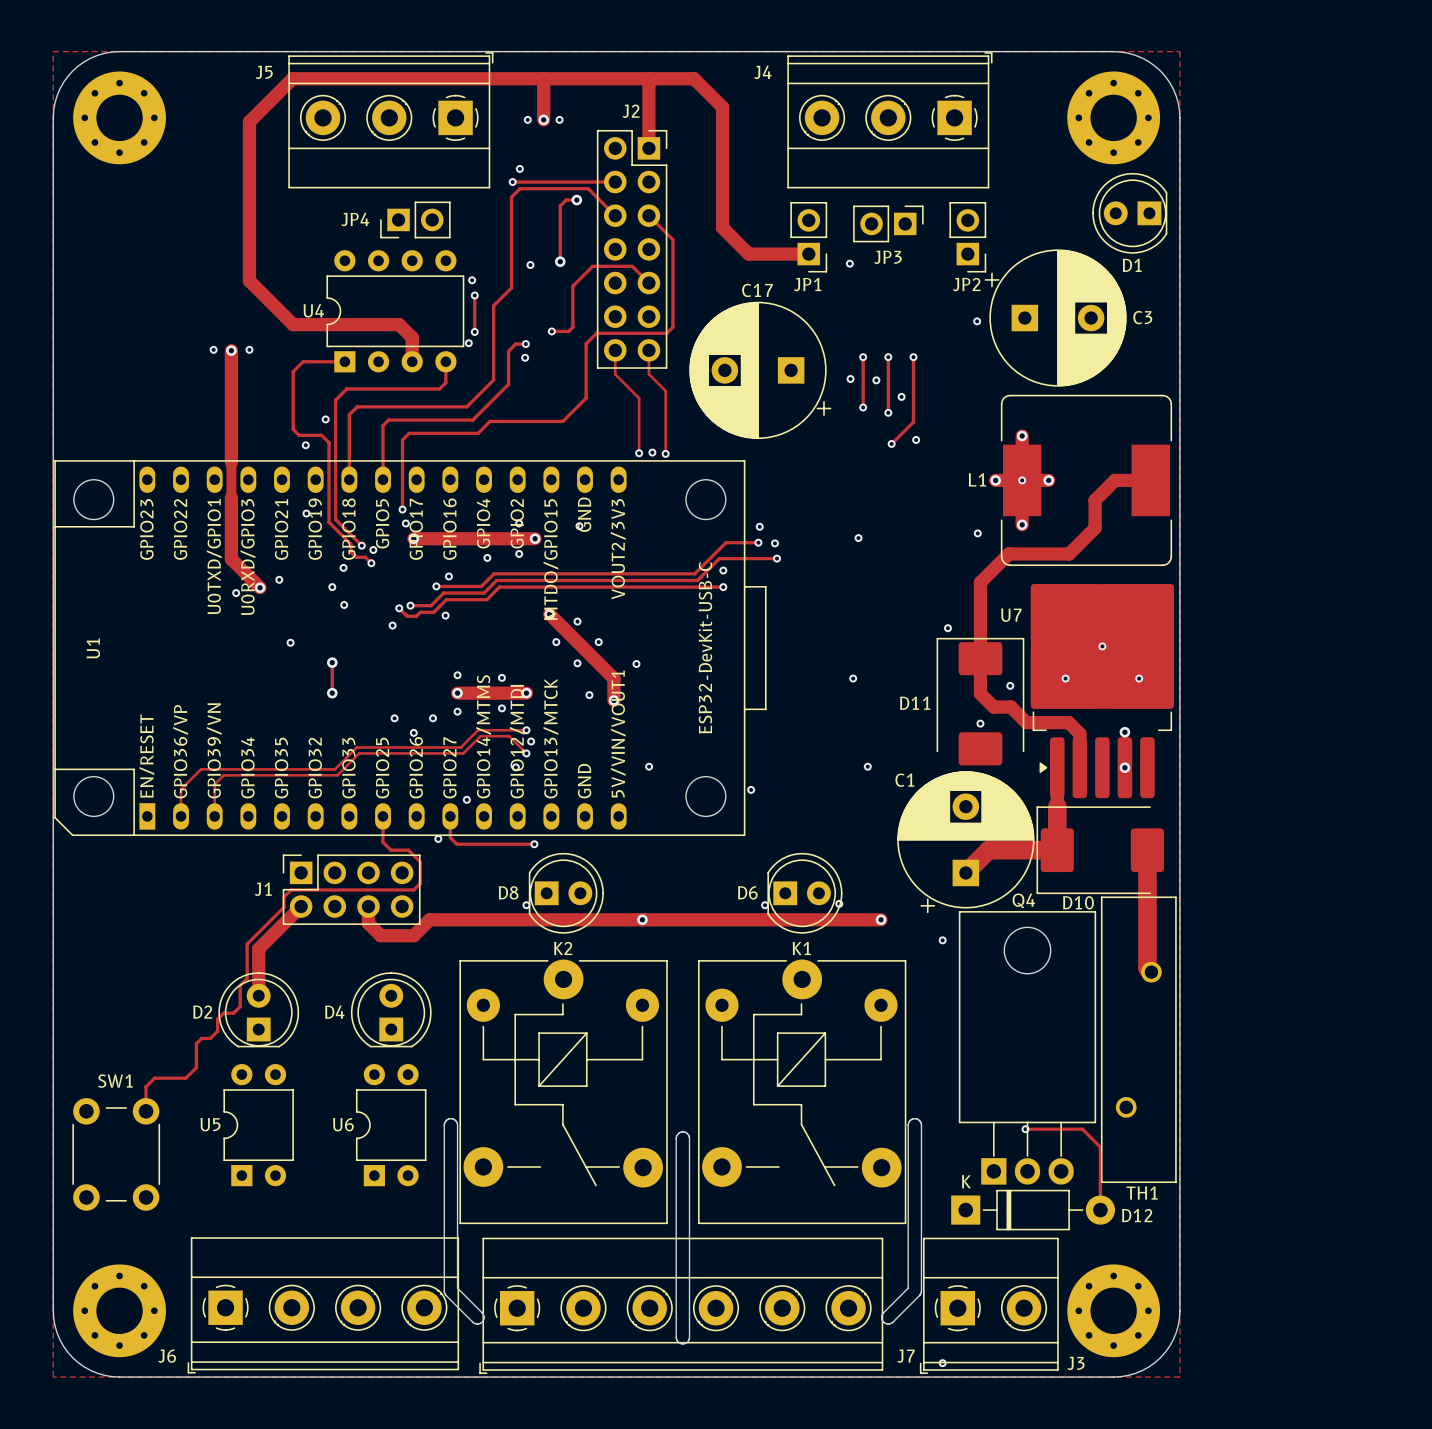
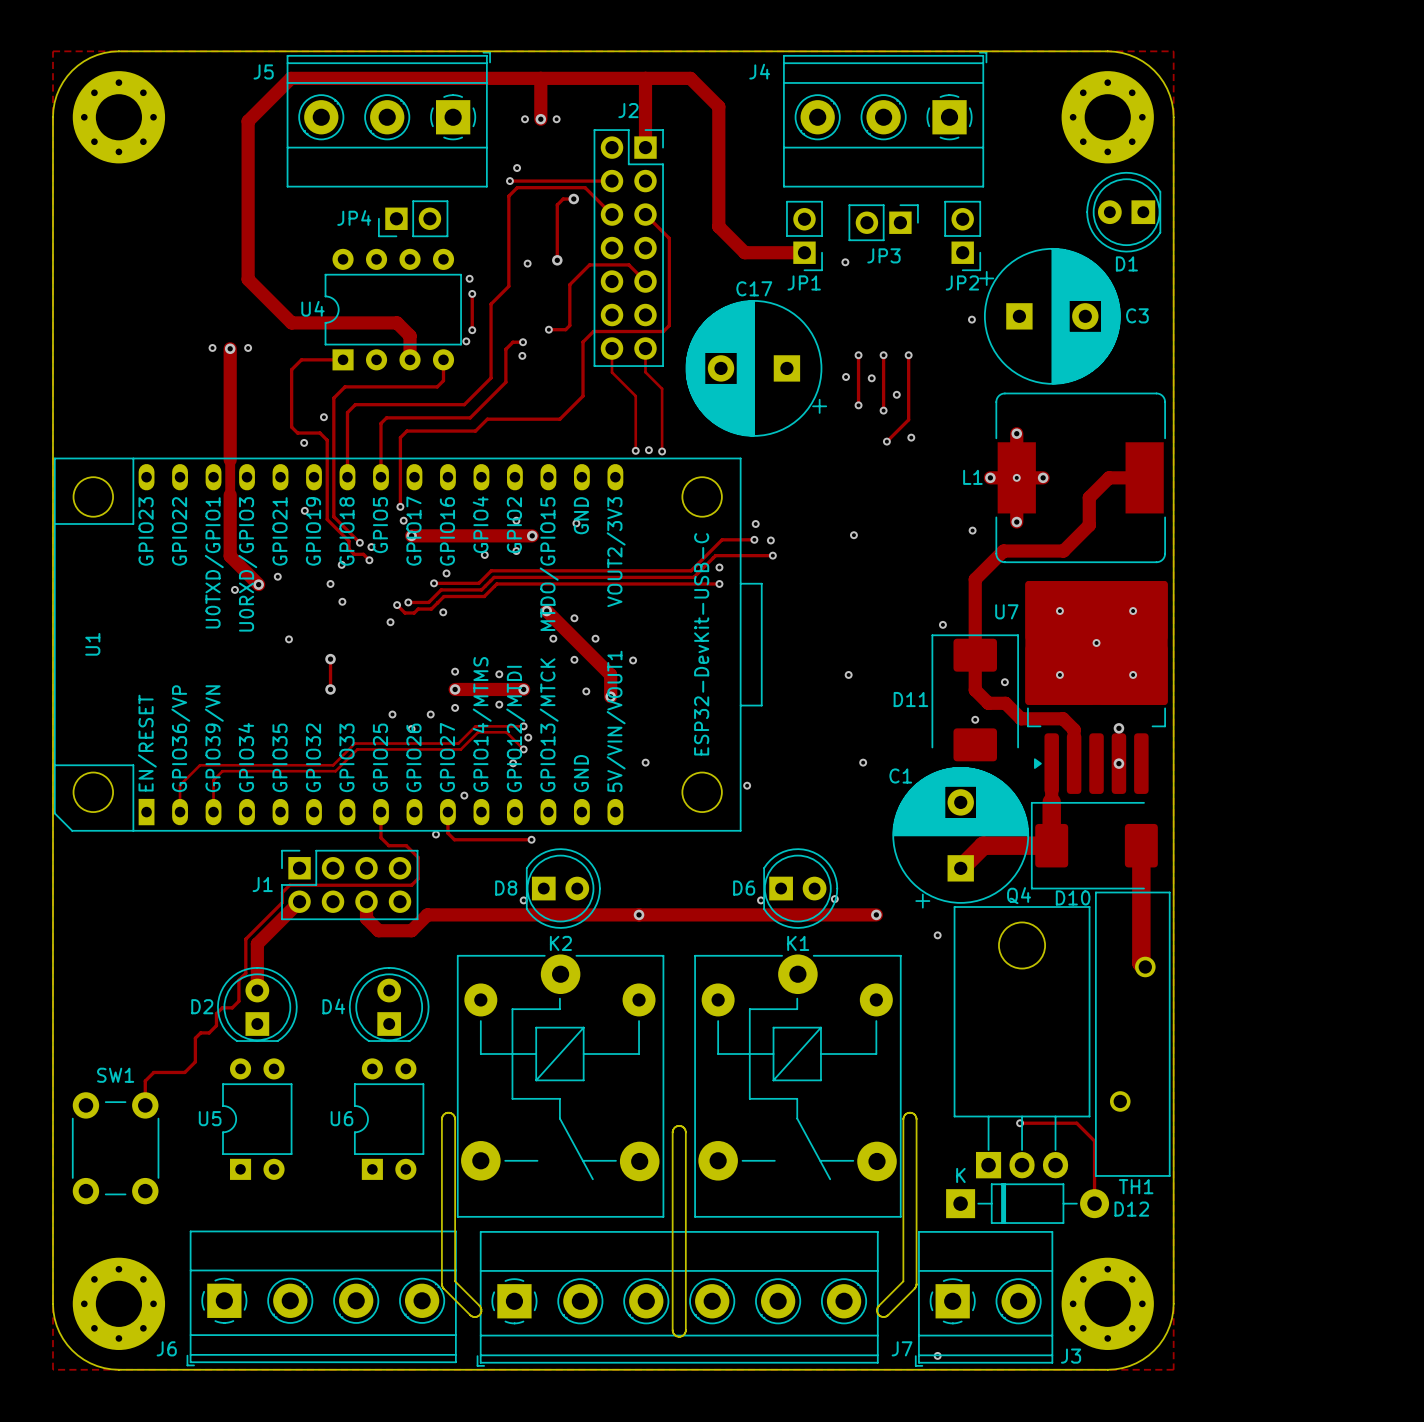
via: none -> (1059, 611)
via: none -> (1133, 611)

